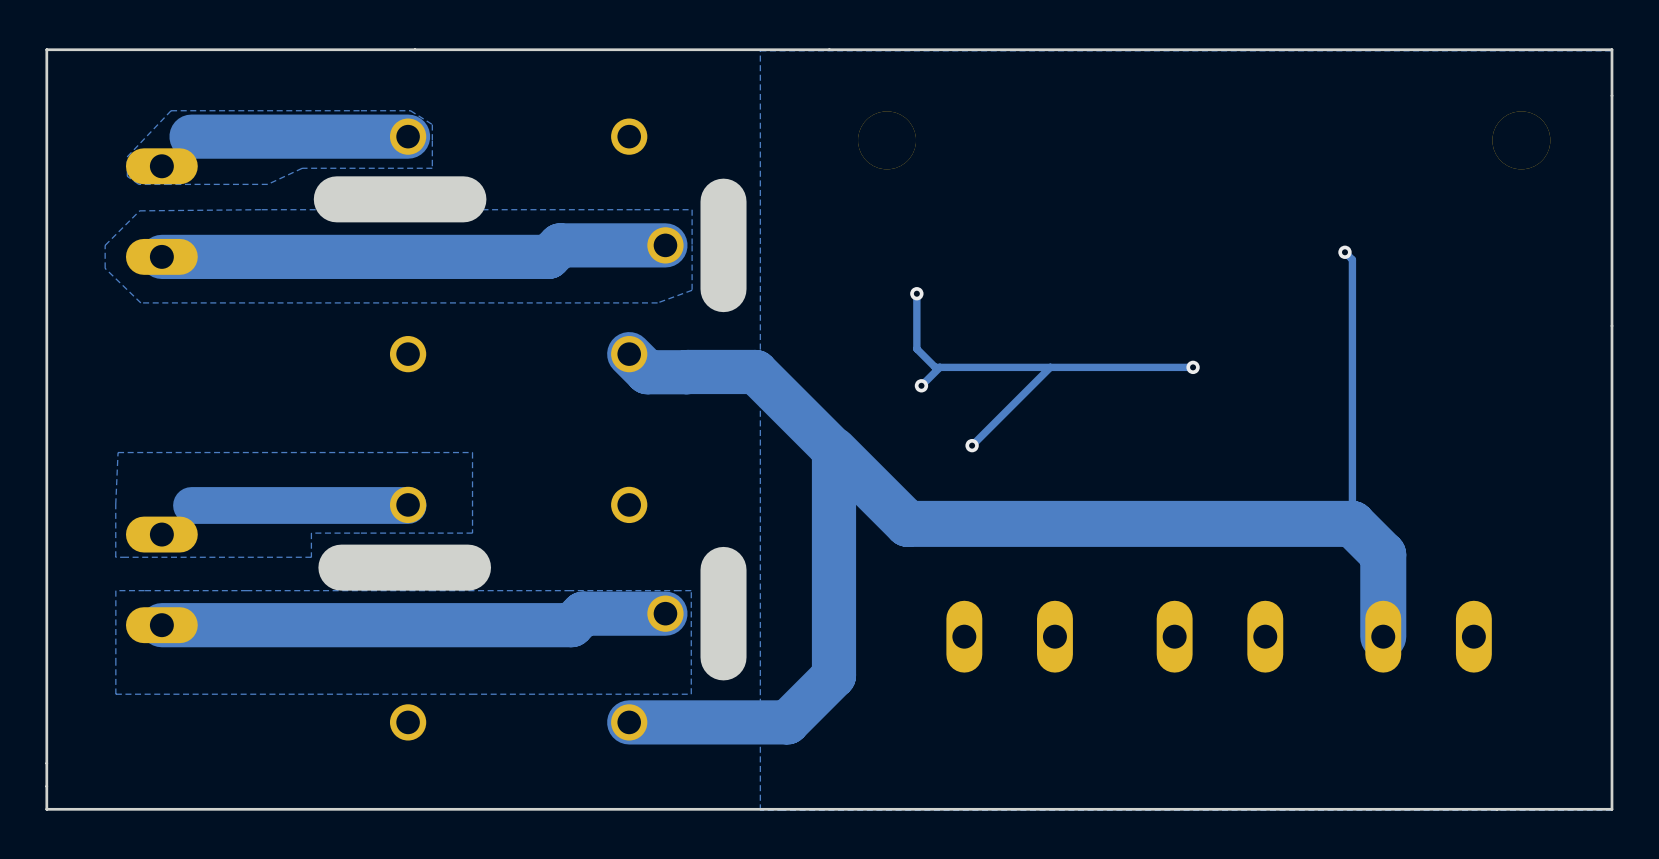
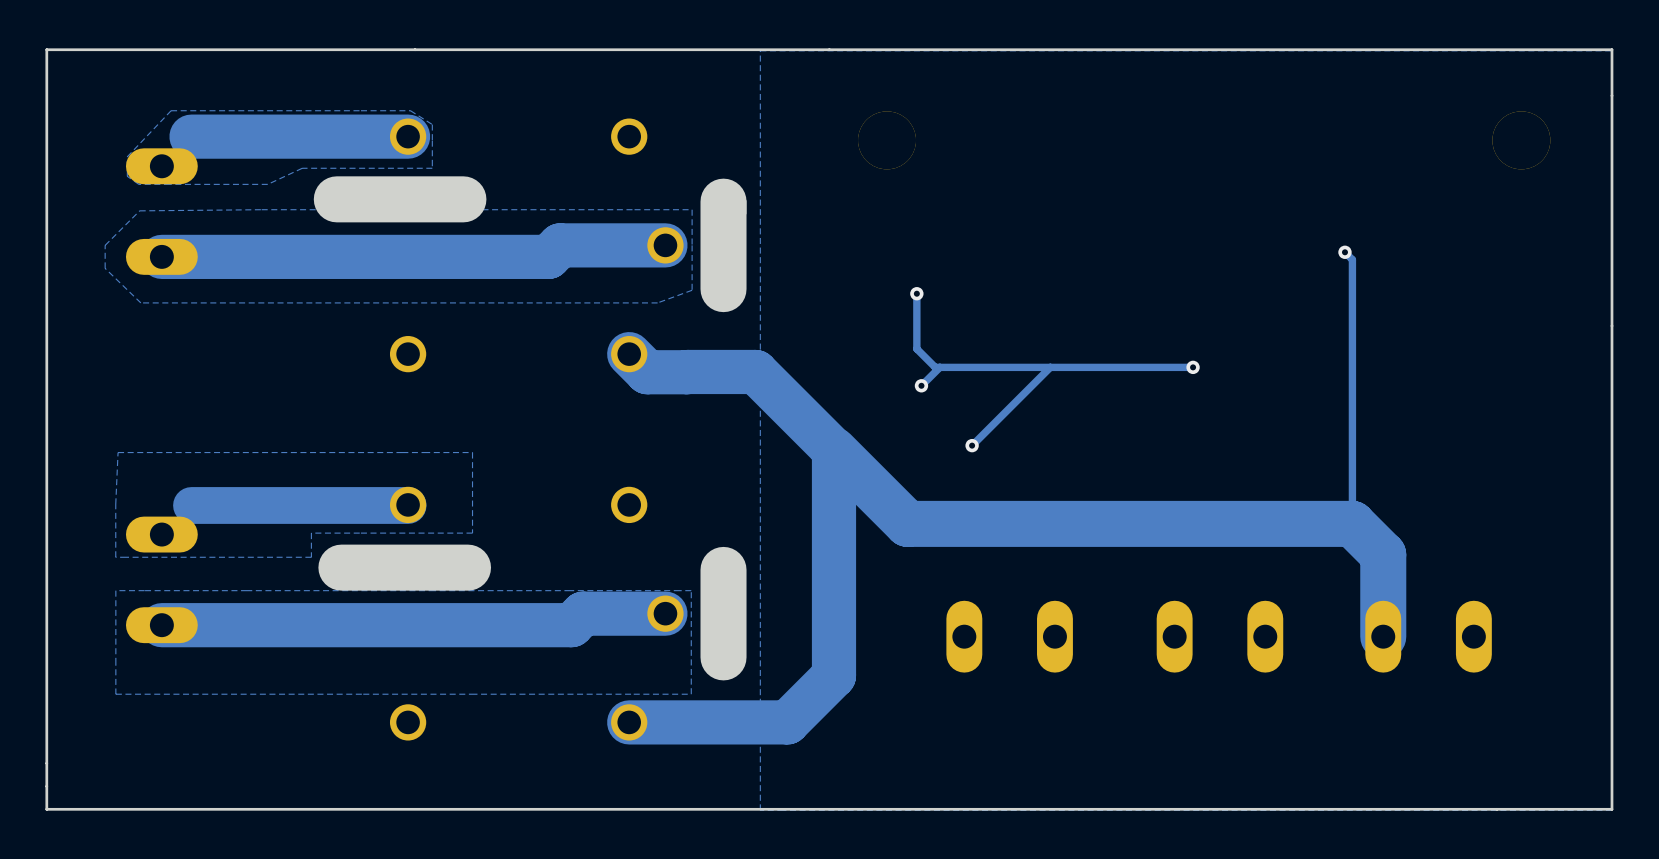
board edge: none -> (745, 200) (745, 213)

